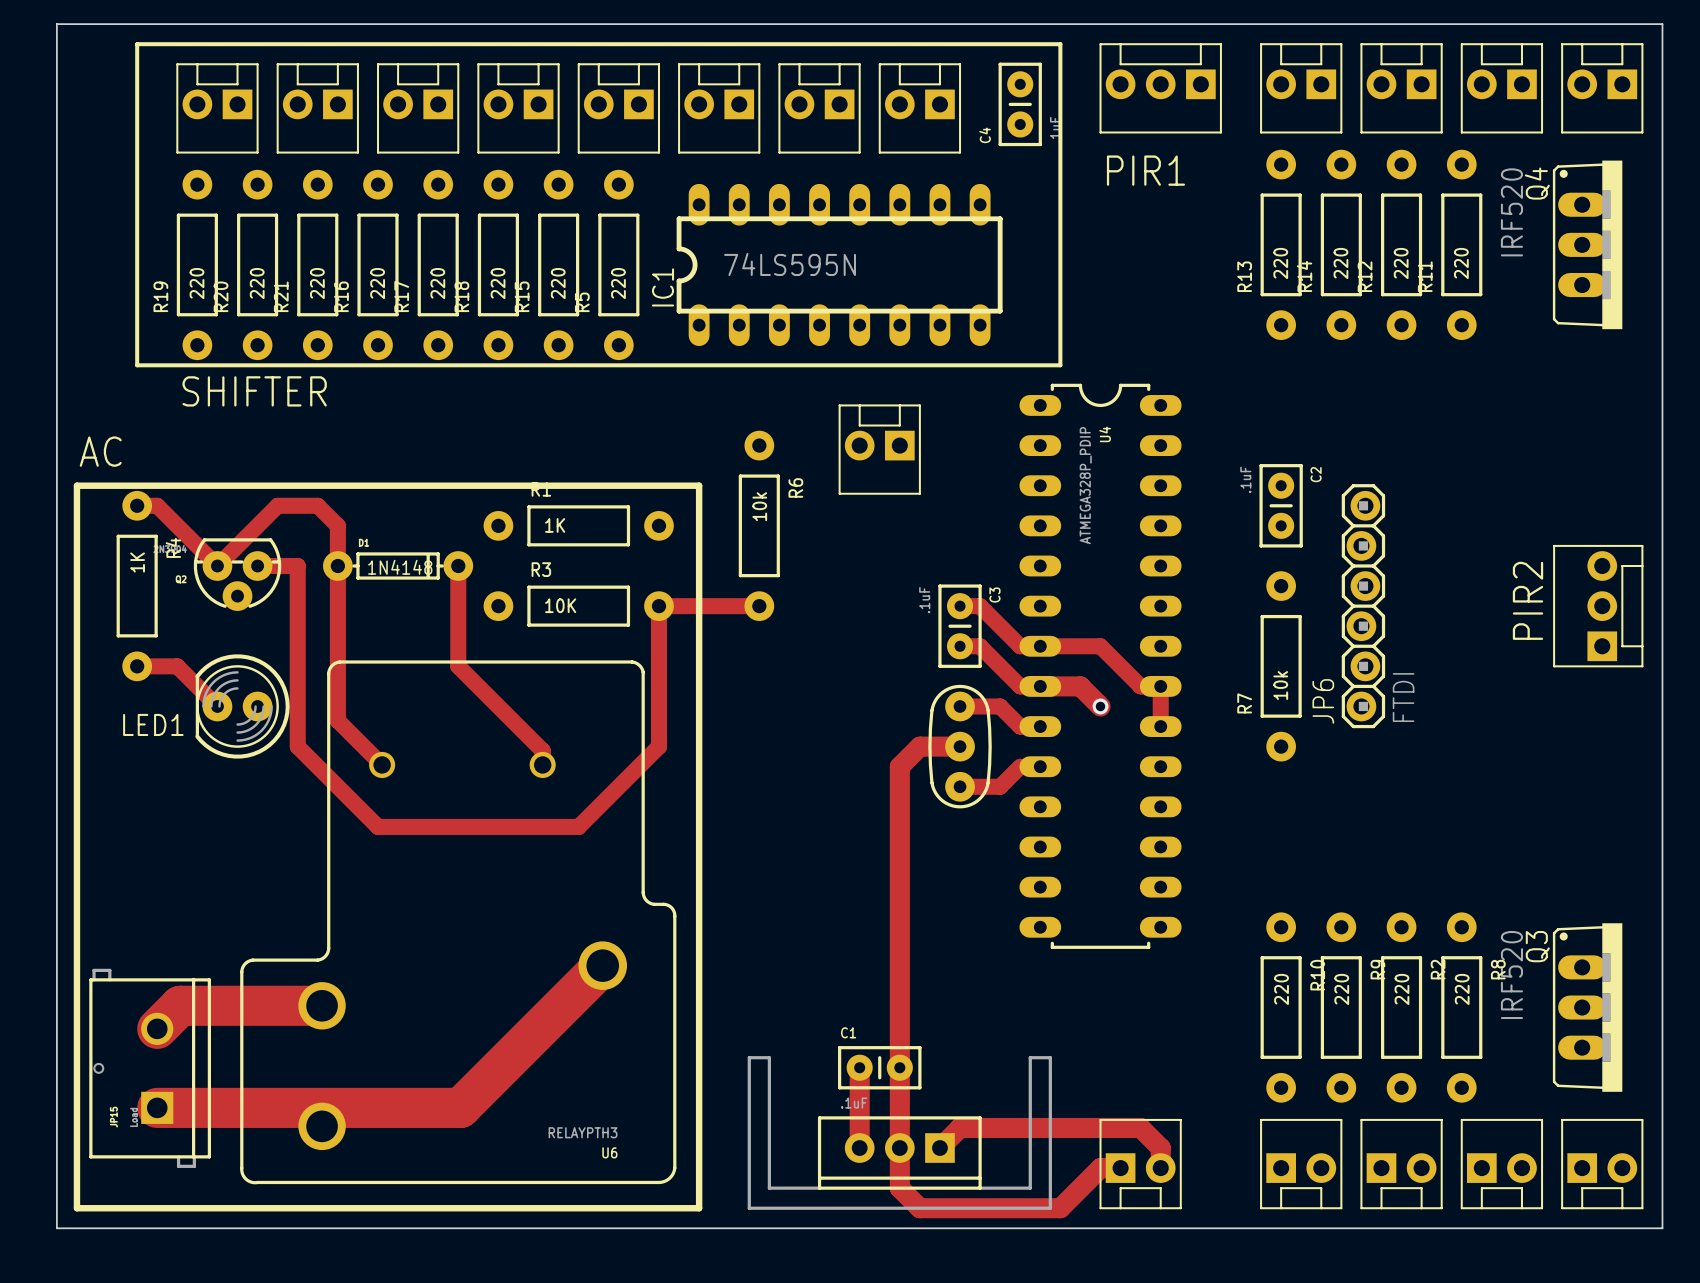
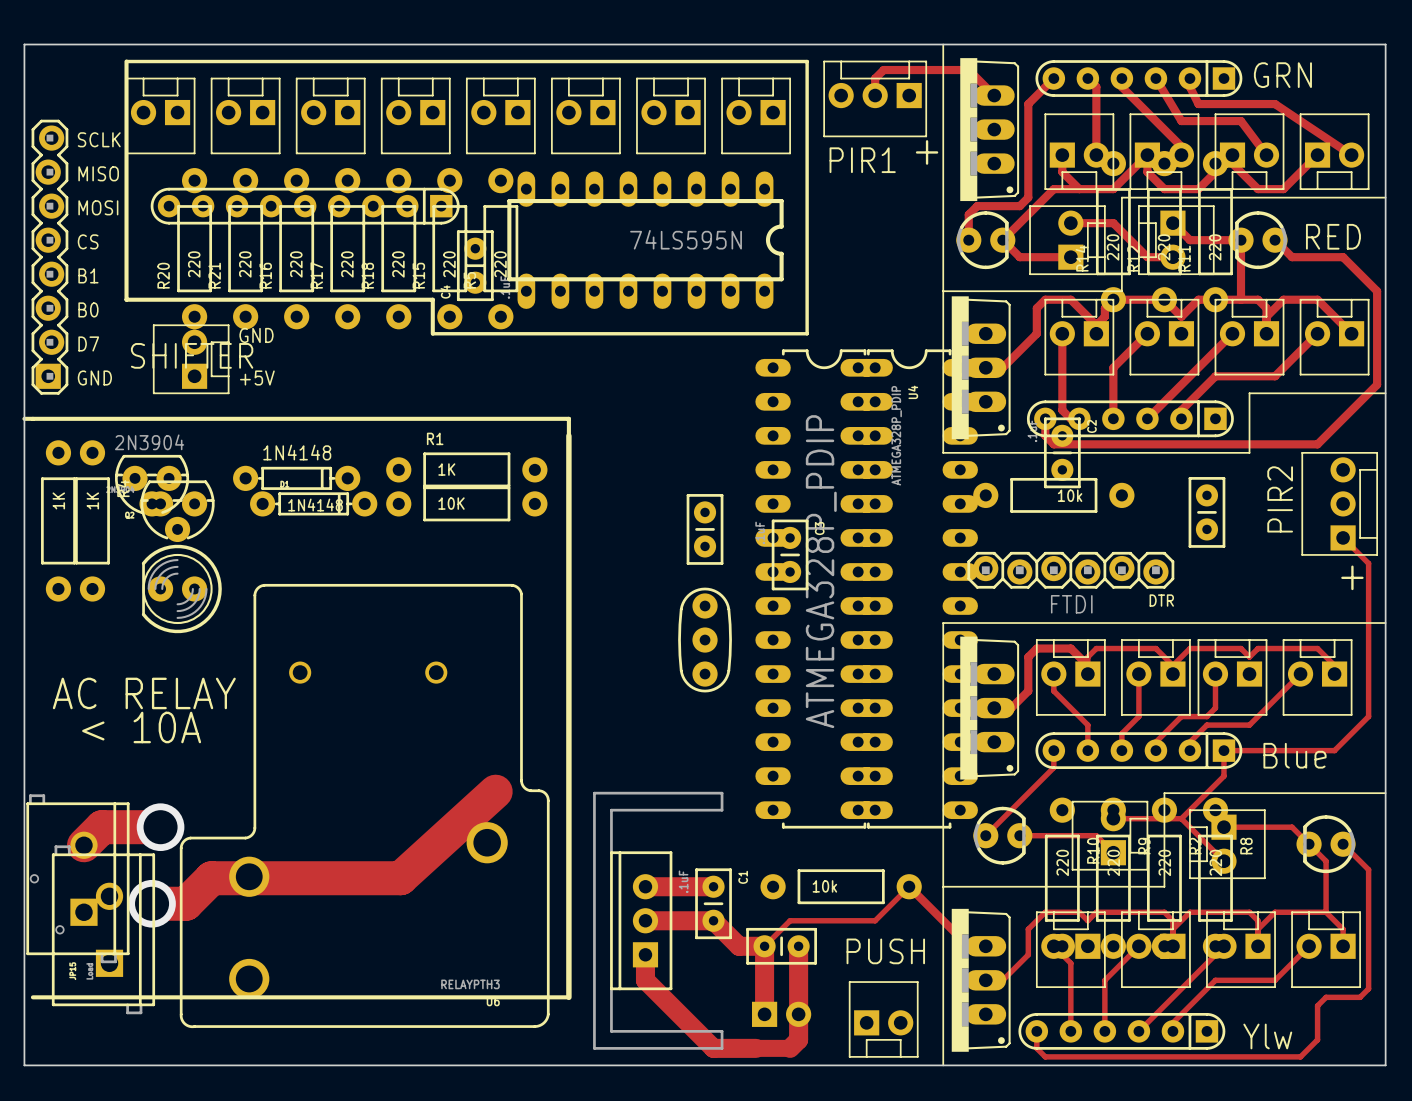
line: none -> (943, 44) (943, 452) (1249, 452) (1249, 393) (1385, 393)
line: (177, 44) (137, 44) (137, 365) (538, 365) -> (126, 61) (126, 299) (432, 299) (432, 333)
line: (980, 44) (1060, 44) (1060, 365) (980, 365) -> (807, 61) (807, 333)
text: none -> GRN (1282, 75)
track: none -> (1053, 78) (1028, 104) (1028, 197) (1019, 206) (977, 206) (968, 214) (968, 240)
track: none -> (1087, 78) (1096, 87) (1096, 155)
track: none -> (1121, 78) (1121, 87) (1181, 146) (1181, 155)
part: none -> (1138, 78)
track: none -> (1155, 78) (1181, 121) (1241, 121) (1266, 155)
track: none -> (1189, 78) (1189, 87) (1198, 104) (1275, 104) (1351, 155)
track: none -> (875, 95) (875, 78) (883, 70) (968, 70) (994, 95)
part position: (1160, 88) -> (875, 98)
part: (1301, 88) -> none
part: (1401, 88) -> none
part: (1501, 88) -> none
part: (1602, 88) -> none
C4 position: (1020, 104) -> (475, 265)
part: none -> (989, 129)
text: none -> SCLK (99, 139)
part: none -> (1079, 151)
part: none -> (1164, 151)
part: none -> (1249, 151)
part: none -> (1334, 151)
text: none -> + (927, 152)
track: none -> (1062, 155) (1062, 172) (1079, 189)
track: none -> (1317, 155) (1283, 189) (1258, 189) (1232, 163) (1232, 155) (1198, 189) (1164, 189) (1147, 172) (1147, 155) (1113, 189) (1053, 189) (1002, 240) (1019, 257) (1070, 257)
text position: PIR1 (1145, 170) -> PIR1 (862, 160)
text: none -> MISO (98, 173)
line: none -> (1385, 197) (1121, 197) (1121, 291) (943, 291)
part: none -> (305, 206)
text: none -> MOSI (98, 207)
track: none -> (1070, 223) (1113, 223) (1147, 257) (1172, 257)
track: none -> (1172, 223) (1189, 240) (1241, 240) (1241, 299)
R13: 220 (1281, 244) -> none
Q4: IRF520 (1587, 244) -> none
text: none -> RED (1333, 236)
part: none -> 74LS595N (645, 240)
part: none -> (985, 240)
part: none -> (1067, 240)
part: none -> (1176, 240)
part: none -> (1258, 240)
track: none -> (1275, 240) (1292, 257) (1343, 257) (1377, 291) (1377, 384) (1317, 444) (1053, 444) (1045, 435) (1045, 418)
text: none -> CS (88, 241)
R19: 220 (197, 264) -> none
IC1: 74LS595N (839, 264) -> none
part: none -> (49, 257)
text: none -> B1 (88, 275)
text: none -> B0 (88, 309)
track: none -> (1266, 316) (1283, 299) (1317, 299) (1351, 333)
track: none -> (1096, 325) (1104, 316) (1104, 308) (1113, 299) (1164, 299) (1181, 316) (1198, 299) (1258, 299) (1266, 308) (1266, 333)
track: none -> (1096, 325) (1070, 299) (1045, 299) (1036, 308) (1036, 333) (1002, 367) (985, 367)
track: none -> (1062, 333) (1062, 410) (1070, 418) (1079, 418)
track: none -> (1147, 333) (1113, 367) (1113, 418)
track: none -> (1232, 333) (1147, 418)
track: none -> (1317, 333) (1275, 376) (1215, 376) (1181, 410) (1181, 418)
text: none -> GND (256, 335)
part: none -> (1079, 337)
part: none -> (1164, 337)
part: none -> (1249, 337)
part: none -> (1334, 337)
text: none -> D7 (88, 343)
part: none -> (191, 359)
part: none -> (981, 367)
text: none -> GND (94, 377)
text: none -> +5V (257, 377)
part: (879, 449) -> none
text: AC (100, 451) -> none
line: none -> (24, 418) (568, 418) (568, 435)
part: none -> (1130, 418)
line: (699, 485) (76, 485) (76, 1208) (699, 1208) (699, 1148) -> (32, 997) (568, 997)
track: (137, 505) (157, 505) (217, 565) (277, 505) (317, 505) (337, 525) (337, 720) (382, 764) -> none
R6: 10k (759, 525) -> none
part: none -> 1N4148 (296, 478)
part: none -> 2N3904 (152, 485)
part: none -> 10k (1053, 495)
track: (257, 565) (297, 565) (297, 746) (378, 826) (578, 826) (658, 746) (658, 606) (759, 606) -> none
track: (458, 565) (458, 666) (542, 750) (542, 764) -> none
part: none -> 10K (466, 503)
part: none -> (1206, 512)
part: none -> 1K (58, 520)
part: none -> (705, 529)
text position: PIR2 (1528, 600) -> PIR2 (1280, 499)
R3: 10K (578, 606) -> none
track: (960, 606) (980, 606) (1020, 646) (1100, 646) (1140, 686) (1160, 686) (1160, 726) -> none
JP6: FTDI (1363, 606) -> none
part position: (1598, 606) -> (1339, 503)
track: none -> (1343, 537) (1368, 563) (1368, 716) (1334, 750) (1223, 750) (1223, 776) (1181, 818)
part: none -> FTDI (1070, 570)
track: (960, 646) (980, 646) (1020, 686) (1080, 686) (1100, 706) -> none
text: none -> + (1352, 577)
track: (137, 666) (177, 666) (217, 706) -> none
part: none -> (181, 588)
part: none -> ATMEGA328P_PDIP (824, 588)
R7: 10k (1281, 666) -> none
text: none -> DTR (1161, 600)
LED1: (242, 706) -> none
track: (960, 706) (1000, 706) (1020, 726) (1040, 726) -> none
via: (1100, 706) -> none
line: none -> (1385, 623) (943, 623) (943, 1065)
track: (960, 746) (919, 746) (899, 766) (899, 1188) (919, 1208) -> (645, 954) (645, 980) (713, 1048) (756, 1048)
part position: (960, 746) -> (705, 640)
track: none -> (1087, 665) (1070, 648) (1036, 648) (1028, 657) (1028, 691) (1011, 708) (994, 708)
track: none -> (1172, 665) (1155, 648) (1096, 648) (1087, 657) (1087, 674)
track: none -> (1172, 665) (1189, 648) (1241, 648) (1249, 657) (1258, 648) (1317, 648) (1334, 665) (1334, 674)
track: (1020, 766) (1000, 786) (960, 786) -> none
track: none -> (1053, 674) (1053, 691) (1087, 725) (1087, 750)
track: none -> (1138, 674) (1138, 716) (1121, 733) (1121, 750)
track: none -> (1215, 674) (1215, 708) (1206, 716) (1181, 716) (1155, 742) (1155, 750)
track: none -> (1300, 674) (1249, 725) (1206, 725) (1189, 742) (1189, 750)
part: none -> (1070, 677)
part: none -> (1155, 677)
part: none -> (1232, 677)
part: none -> (1317, 677)
text: none -> AC RELAY (144, 693)
part: none -> (989, 708)
text: none -> < 10A (141, 727)
track: none -> (1053, 750) (1053, 767) (985, 835)
part: none -> (1138, 750)
text: none -> Blue (1295, 755)
track: none -> (495, 791) (400, 878) (211, 878) (186, 903) (152, 903)
line: none -> (1385, 793) (1164, 793) (1164, 886) (943, 886)
track: none -> (1113, 818) (1181, 818)
track: none -> (1181, 818) (1223, 861)
track: none -> (160, 827) (102, 827) (83, 845)
via: none -> (160, 827)
track: none -> (1223, 827) (1292, 827) (1326, 861) (1326, 912)
part: none -> (1002, 835)
track: none -> (1019, 835) (1096, 835) (1113, 852)
part: none -> (1109, 835)
track: (602, 965) (460, 1107) (157, 1107) -> none
part: none -> (1227, 844)
part: none -> (1326, 844)
track: none -> (1343, 844) (1368, 869) (1368, 988) (1360, 997) (1326, 997) (1317, 1005) (1317, 1039) (1300, 1056) (1045, 1056) (1036, 1048) (1036, 1031)
track: (322, 1005) (180, 1005) (157, 1028) -> none
Q3: IRF520 (1587, 1007) -> none
part: none -> (77, 878)
track: none -> (645, 886) (713, 886)
part: none -> 10k (841, 886)
via: none -> (152, 903)
track: none -> (1326, 912) (1343, 929) (1343, 946)
track: none -> (1326, 912) (1275, 912) (1258, 929)
track: none -> (645, 920) (713, 920) (739, 946) (764, 946)
track: (859, 1067) (859, 1148) -> (764, 946) (764, 1014)
C1 rotation: 0° (879, 1067) -> 90° clockwise (713, 903)
track: none -> (1172, 929) (1189, 912) (1249, 912) (1258, 920) (1258, 946)
track: none -> (764, 946) (790, 920) (875, 920) (909, 886) (968, 946) (985, 946)
part: none -> (781, 946)
track: none -> (1053, 946) (1070, 963) (1070, 1031)
track: none -> (1138, 946) (1104, 980) (1104, 1031)
track: none -> (1172, 946) (1172, 920) (1164, 912) (1096, 912) (1087, 920) (1079, 912) (1045, 912) (1028, 929) (1028, 954) (1002, 980) (985, 980)
track: none -> (1223, 946) (1138, 1031)
track: none -> (1309, 946) (1275, 980) (1215, 980) (1172, 1022) (1172, 1031)
part: none -> (1070, 949)
part: none -> (1155, 949)
part: none -> (1241, 949)
part: none -> (1326, 949)
text: none -> PUSH (885, 951)
part: none -> (981, 980)
part rotation: 0° (899, 1132) -> 90° clockwise (658, 920)
track: (939, 1148) (960, 1127) (1140, 1127) (1160, 1148) (1160, 1168) -> none
part side: top (1140, 1164) -> bottom (781, 1014)
part: (1301, 1164) -> none
part: (1401, 1164) -> none
part: (1501, 1164) -> none
part: (1602, 1164) -> none
track: (1120, 1168) (1100, 1168) (1060, 1208) (960, 1208) -> (798, 946) (798, 1039) (790, 1048)
part: none -> (883, 1019)
part: none -> (1121, 1031)
text: none -> Ylw (1267, 1036)

